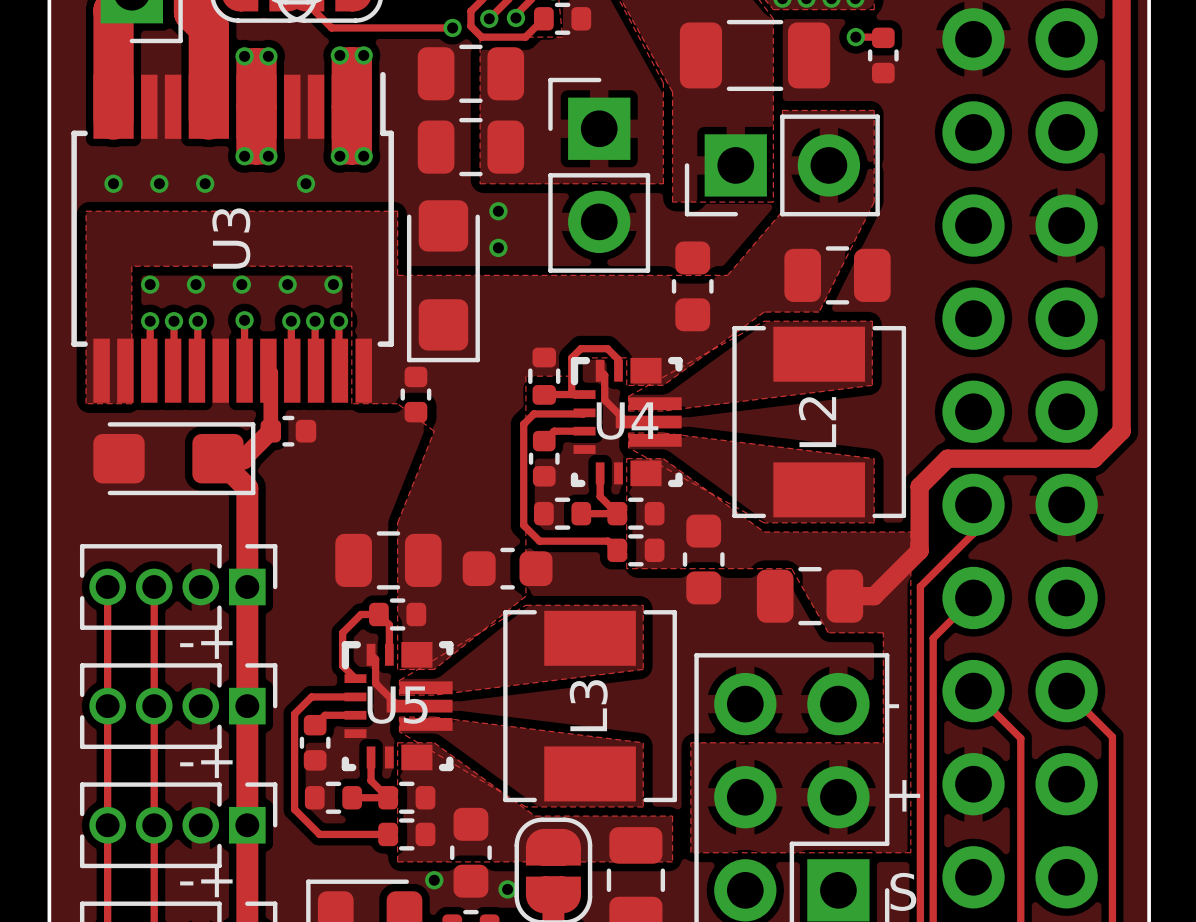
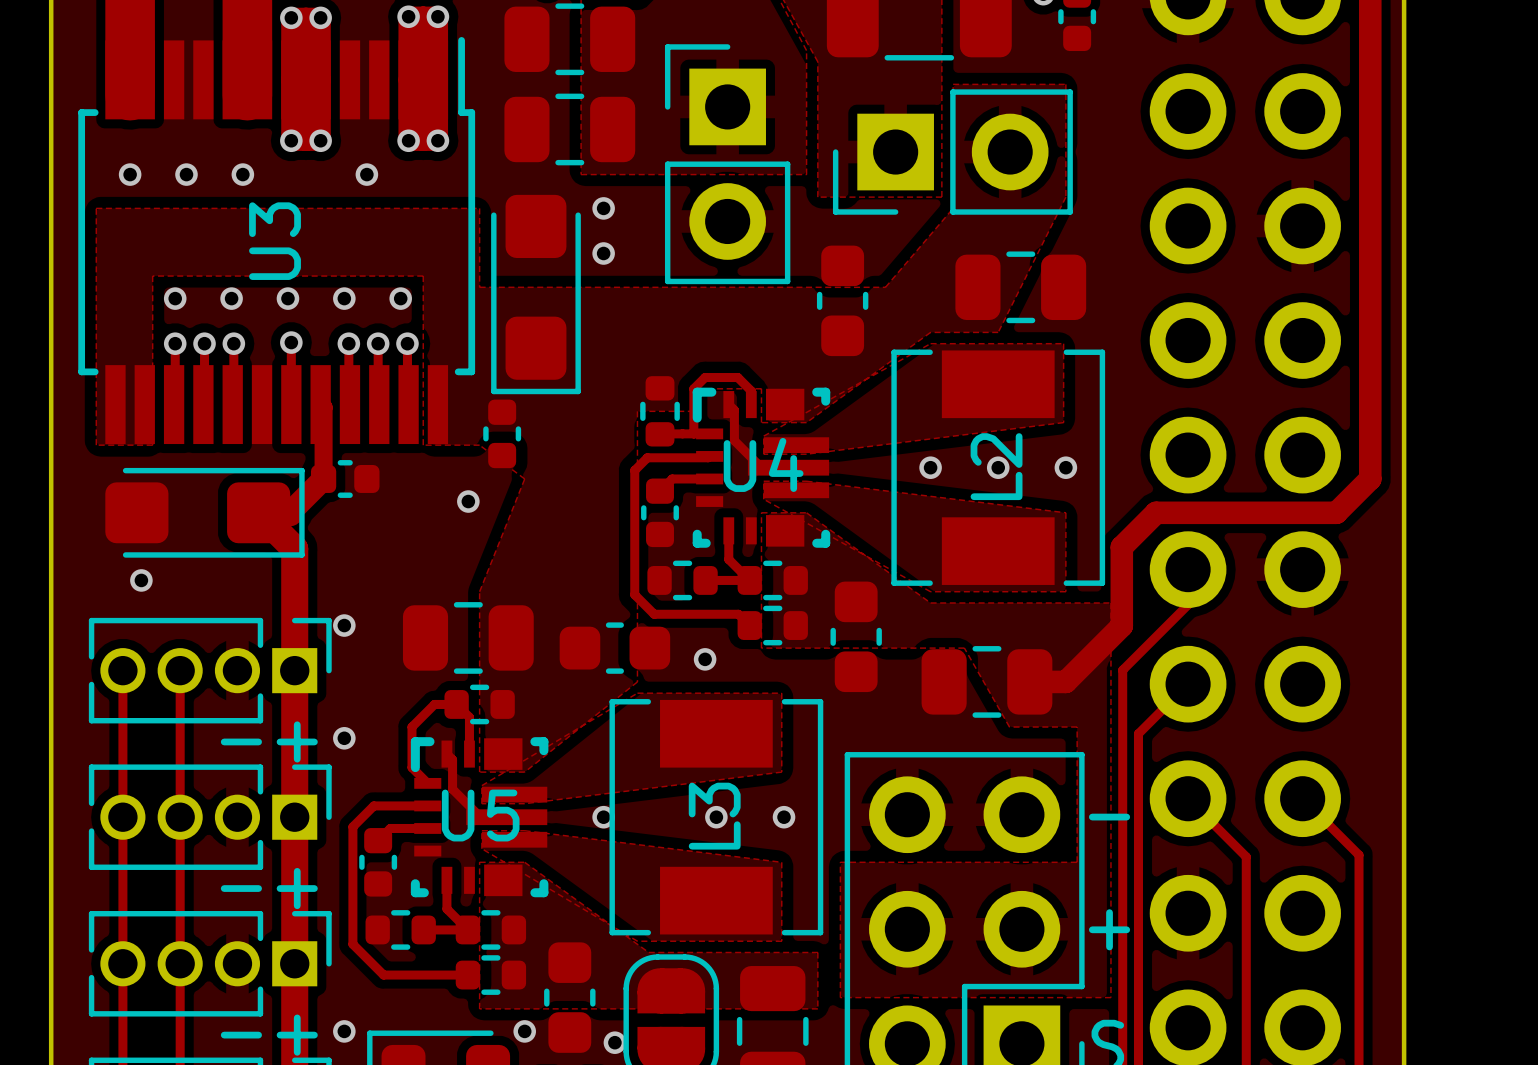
via: none -> (930, 467)
via: none -> (998, 467)
via: none -> (1065, 467)
via: none -> (468, 501)
via: none -> (141, 580)
via: none -> (344, 625)
via: none -> (705, 659)
via: none -> (344, 738)
via: none -> (603, 817)
via: none -> (716, 817)
via: none -> (784, 817)
via: none -> (344, 1031)

